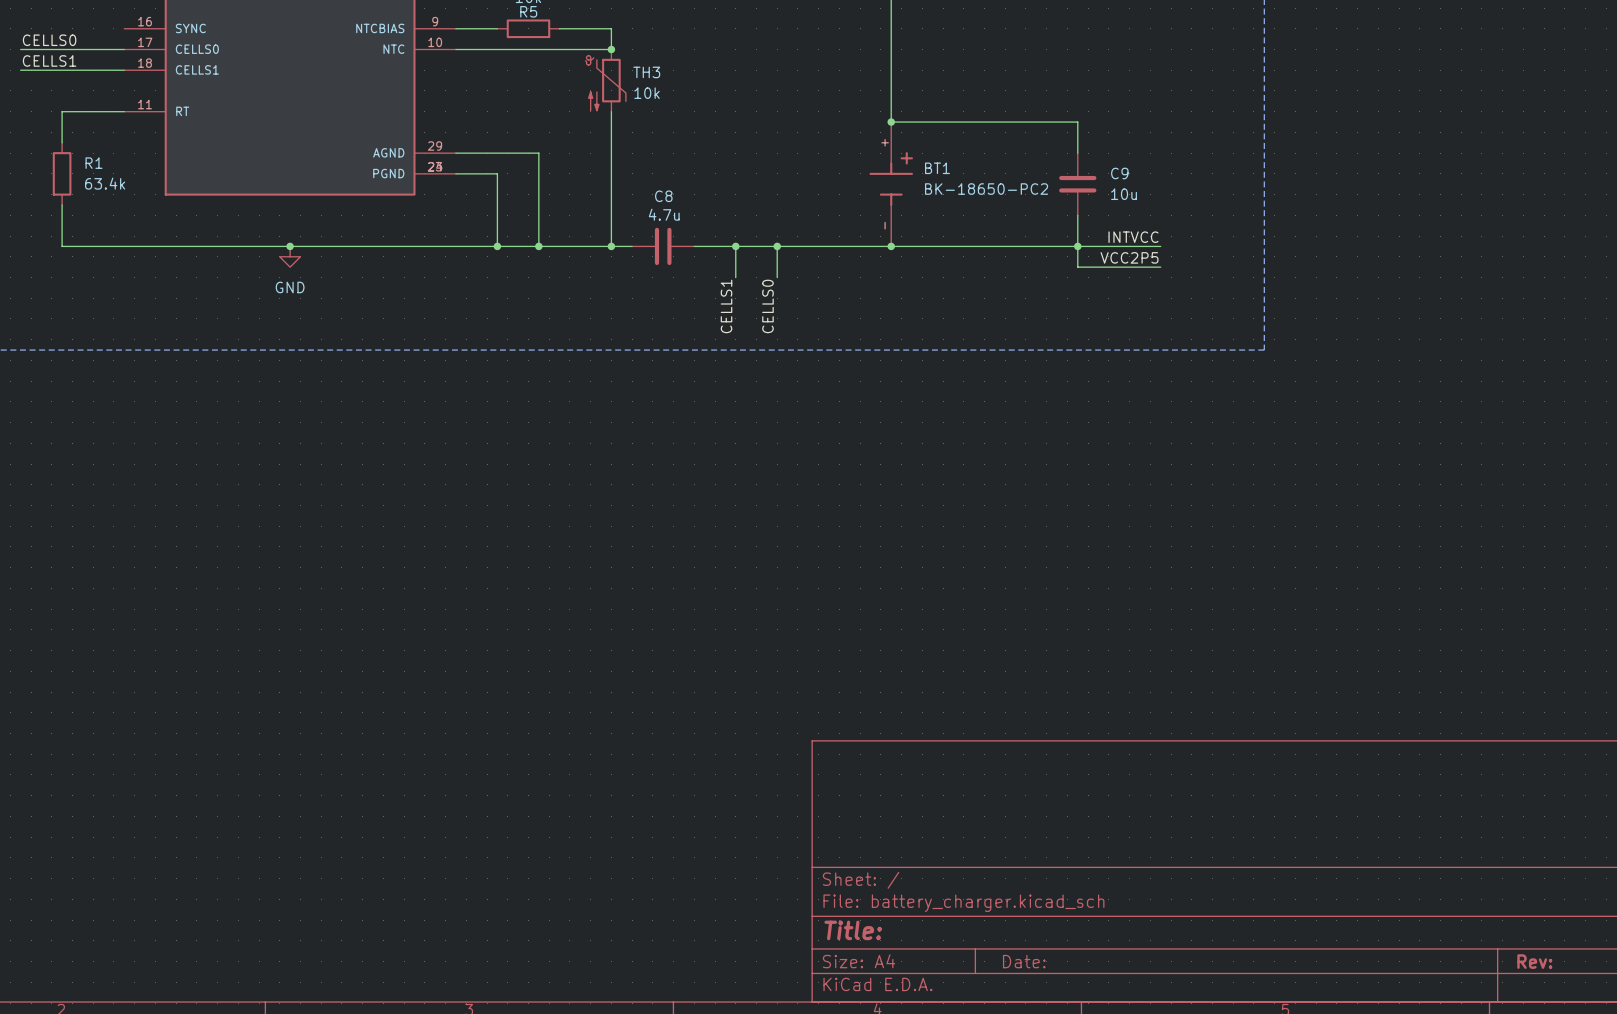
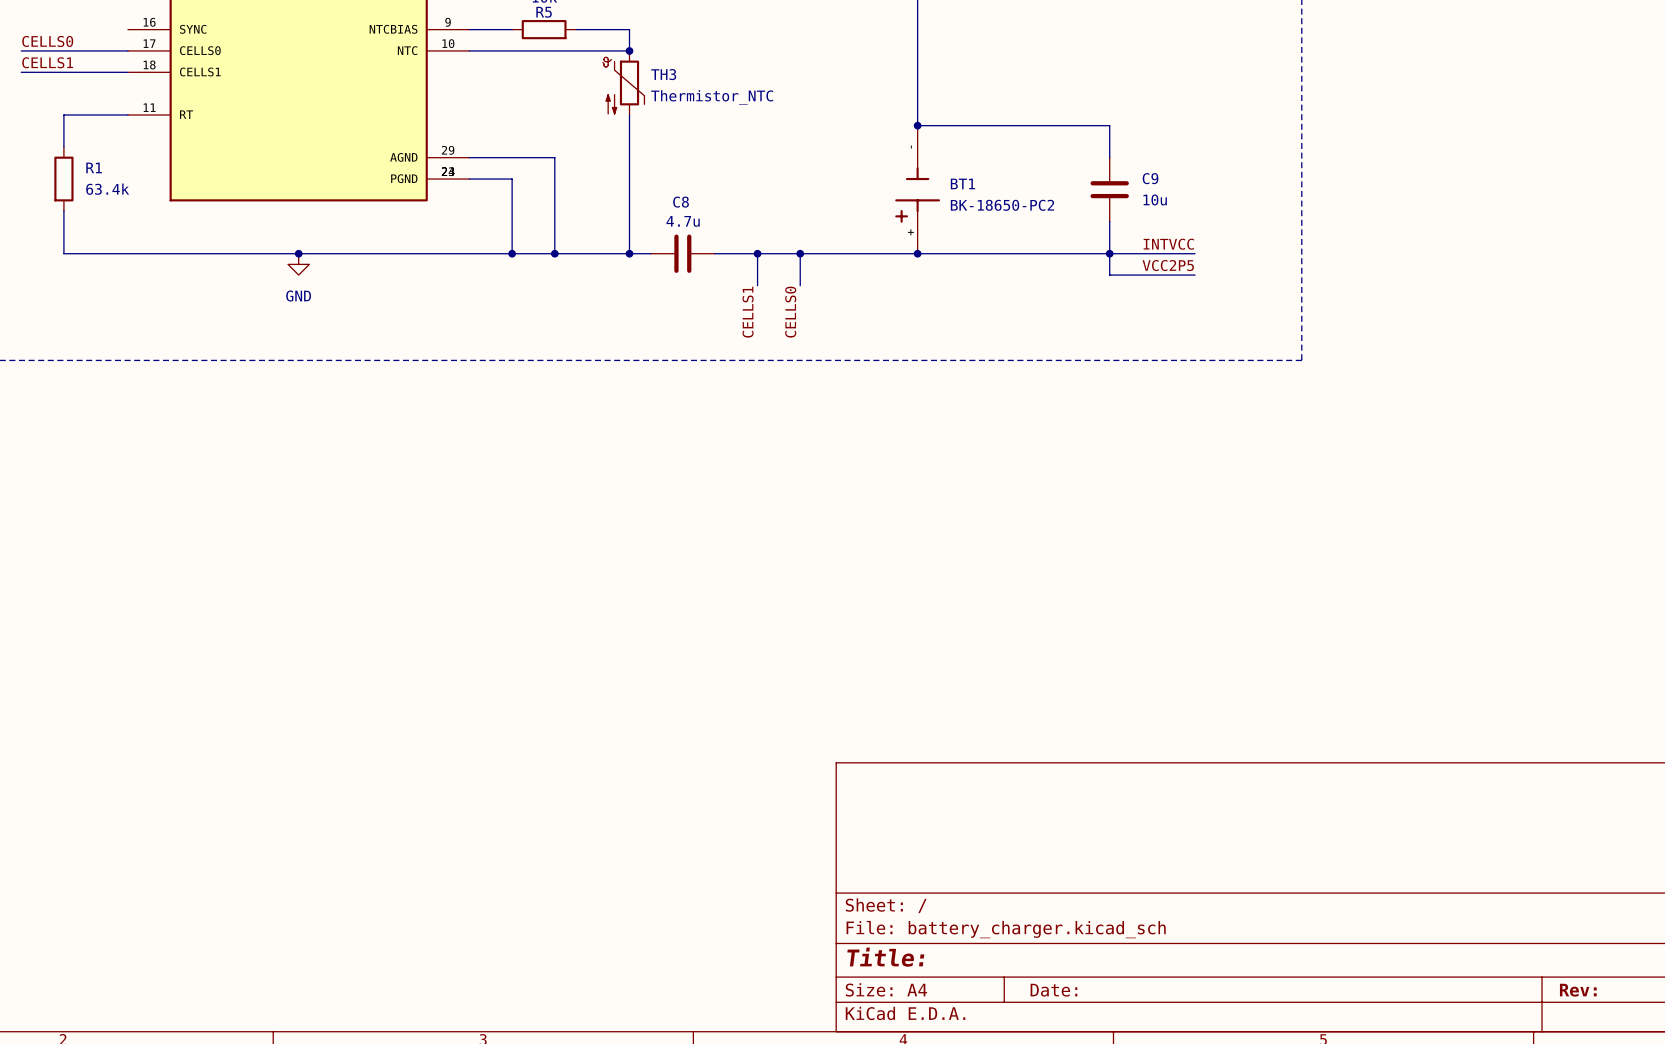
TH3 value: 10k (647, 93) -> Thermistor_NTC (712, 97)
BT1 rotation: 0° (891, 179) -> 180° (917, 195)

